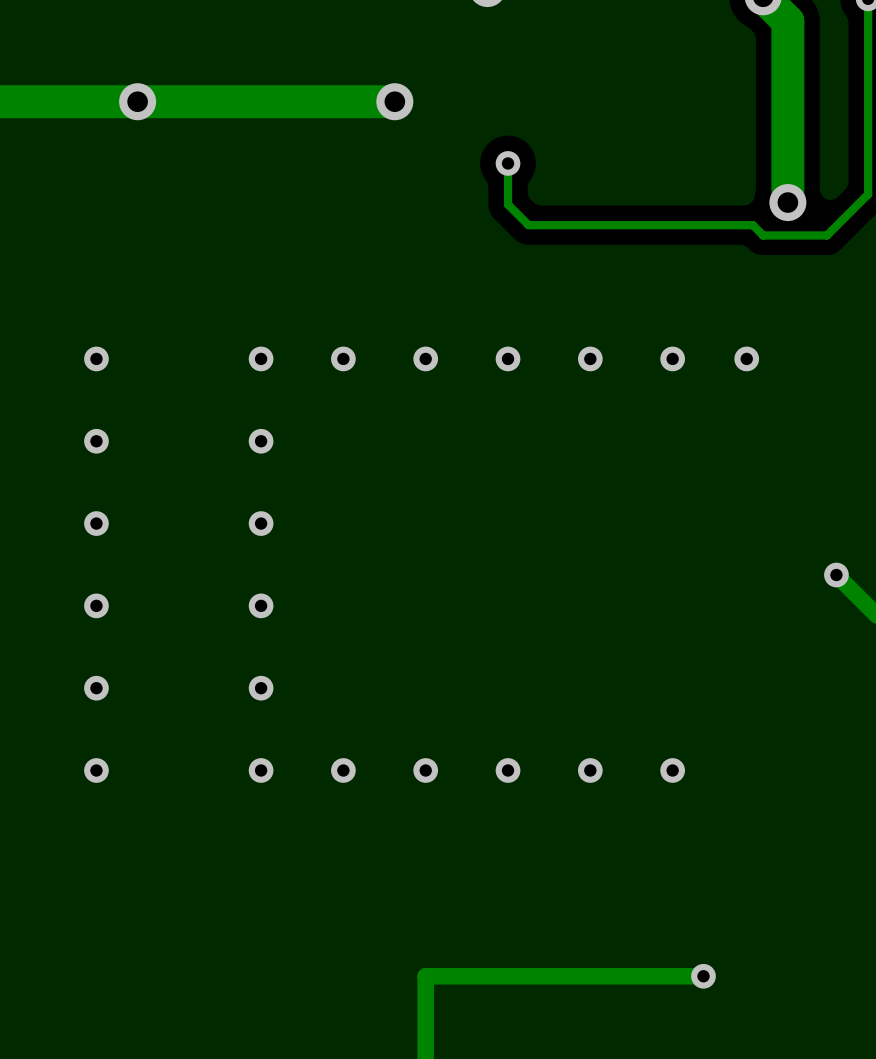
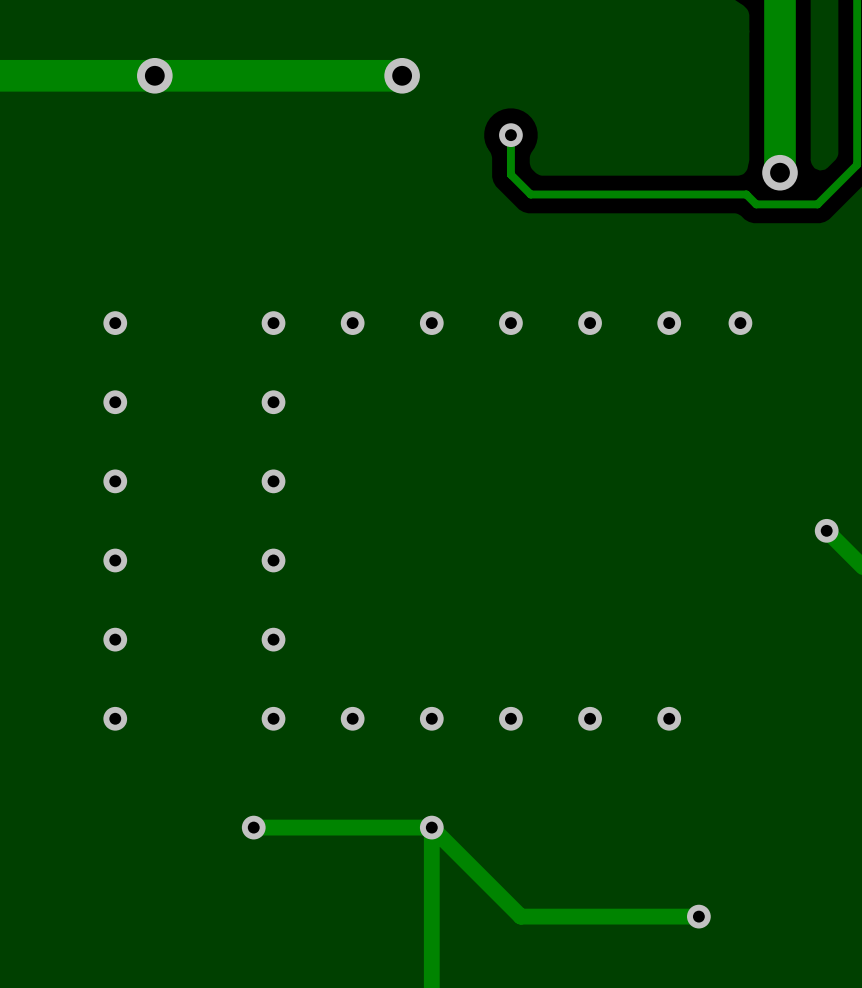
via: none -> (253, 827)
track: none -> (431, 827) (253, 827)
track: none -> (431, 827) (431, 916)
via: none -> (431, 827)
track: (518, 976) (425, 976) -> (520, 916) (431, 827)

